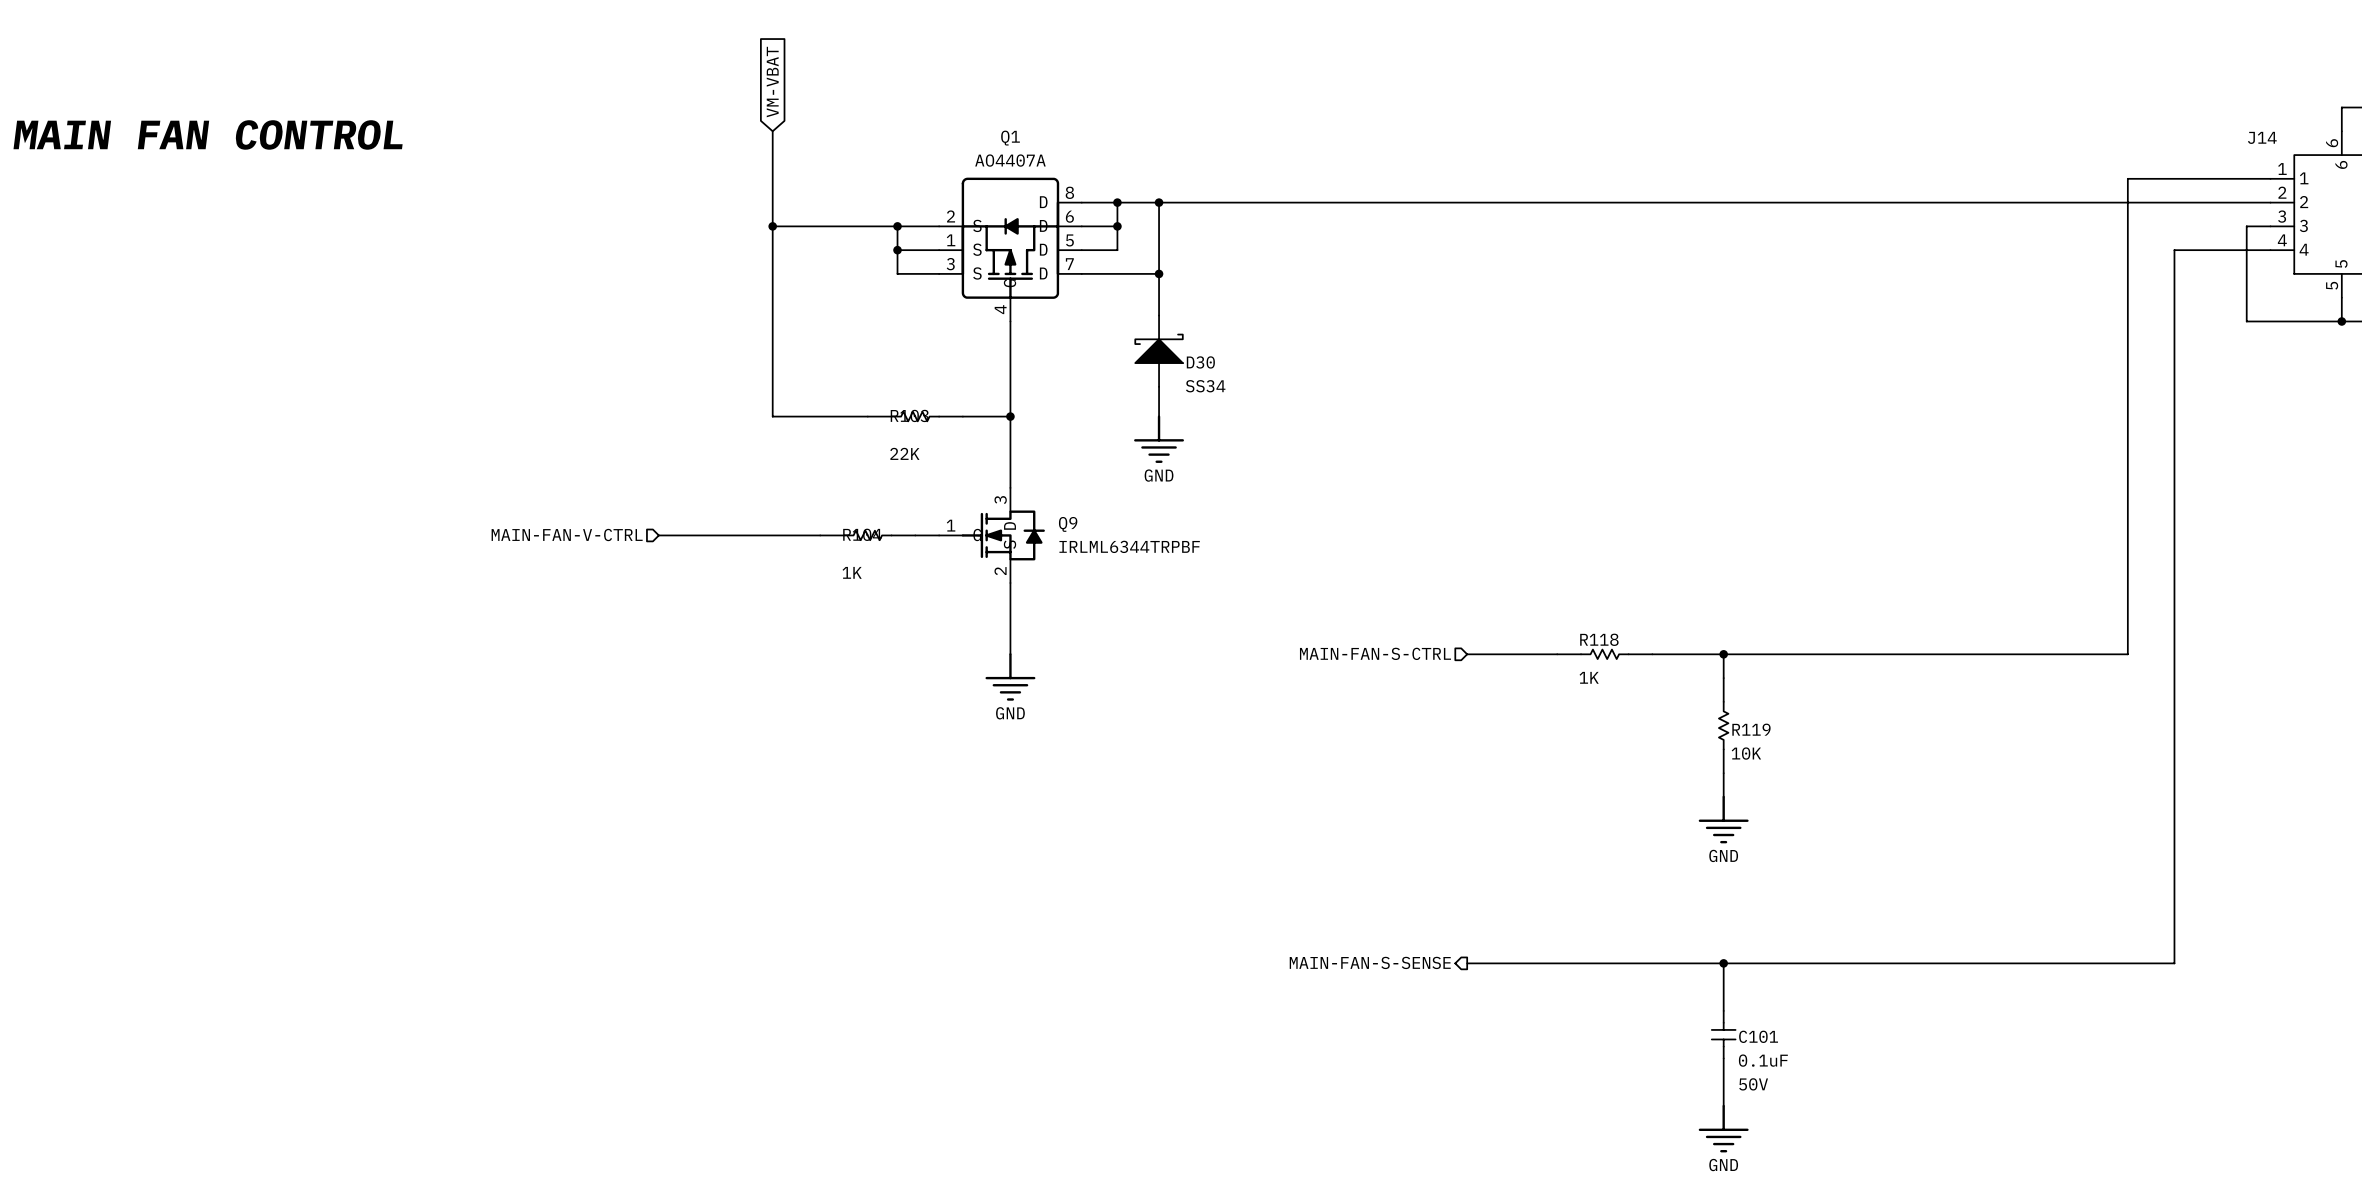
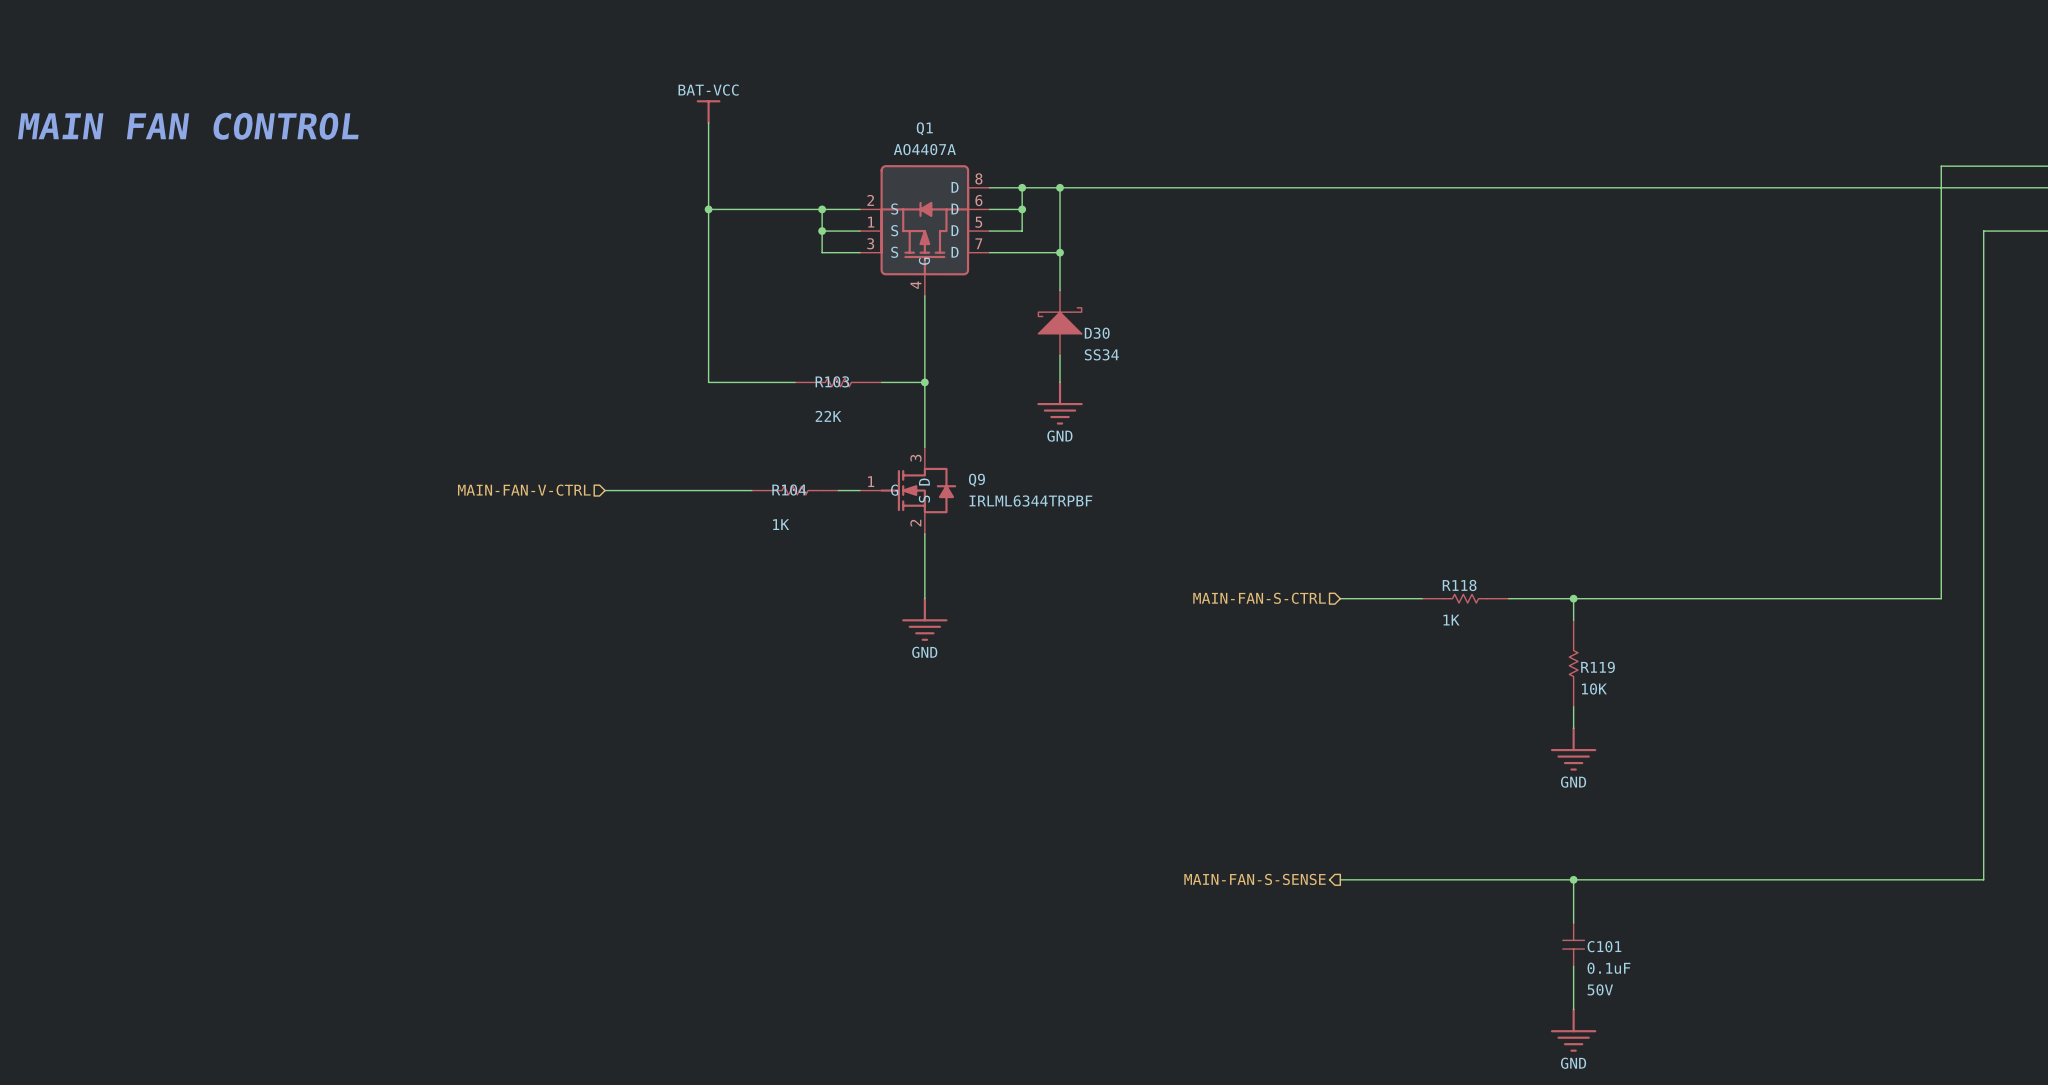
global label: VM-VBAT (772, 82) -> none
power symbol: none -> BAT-VCC (708, 112)

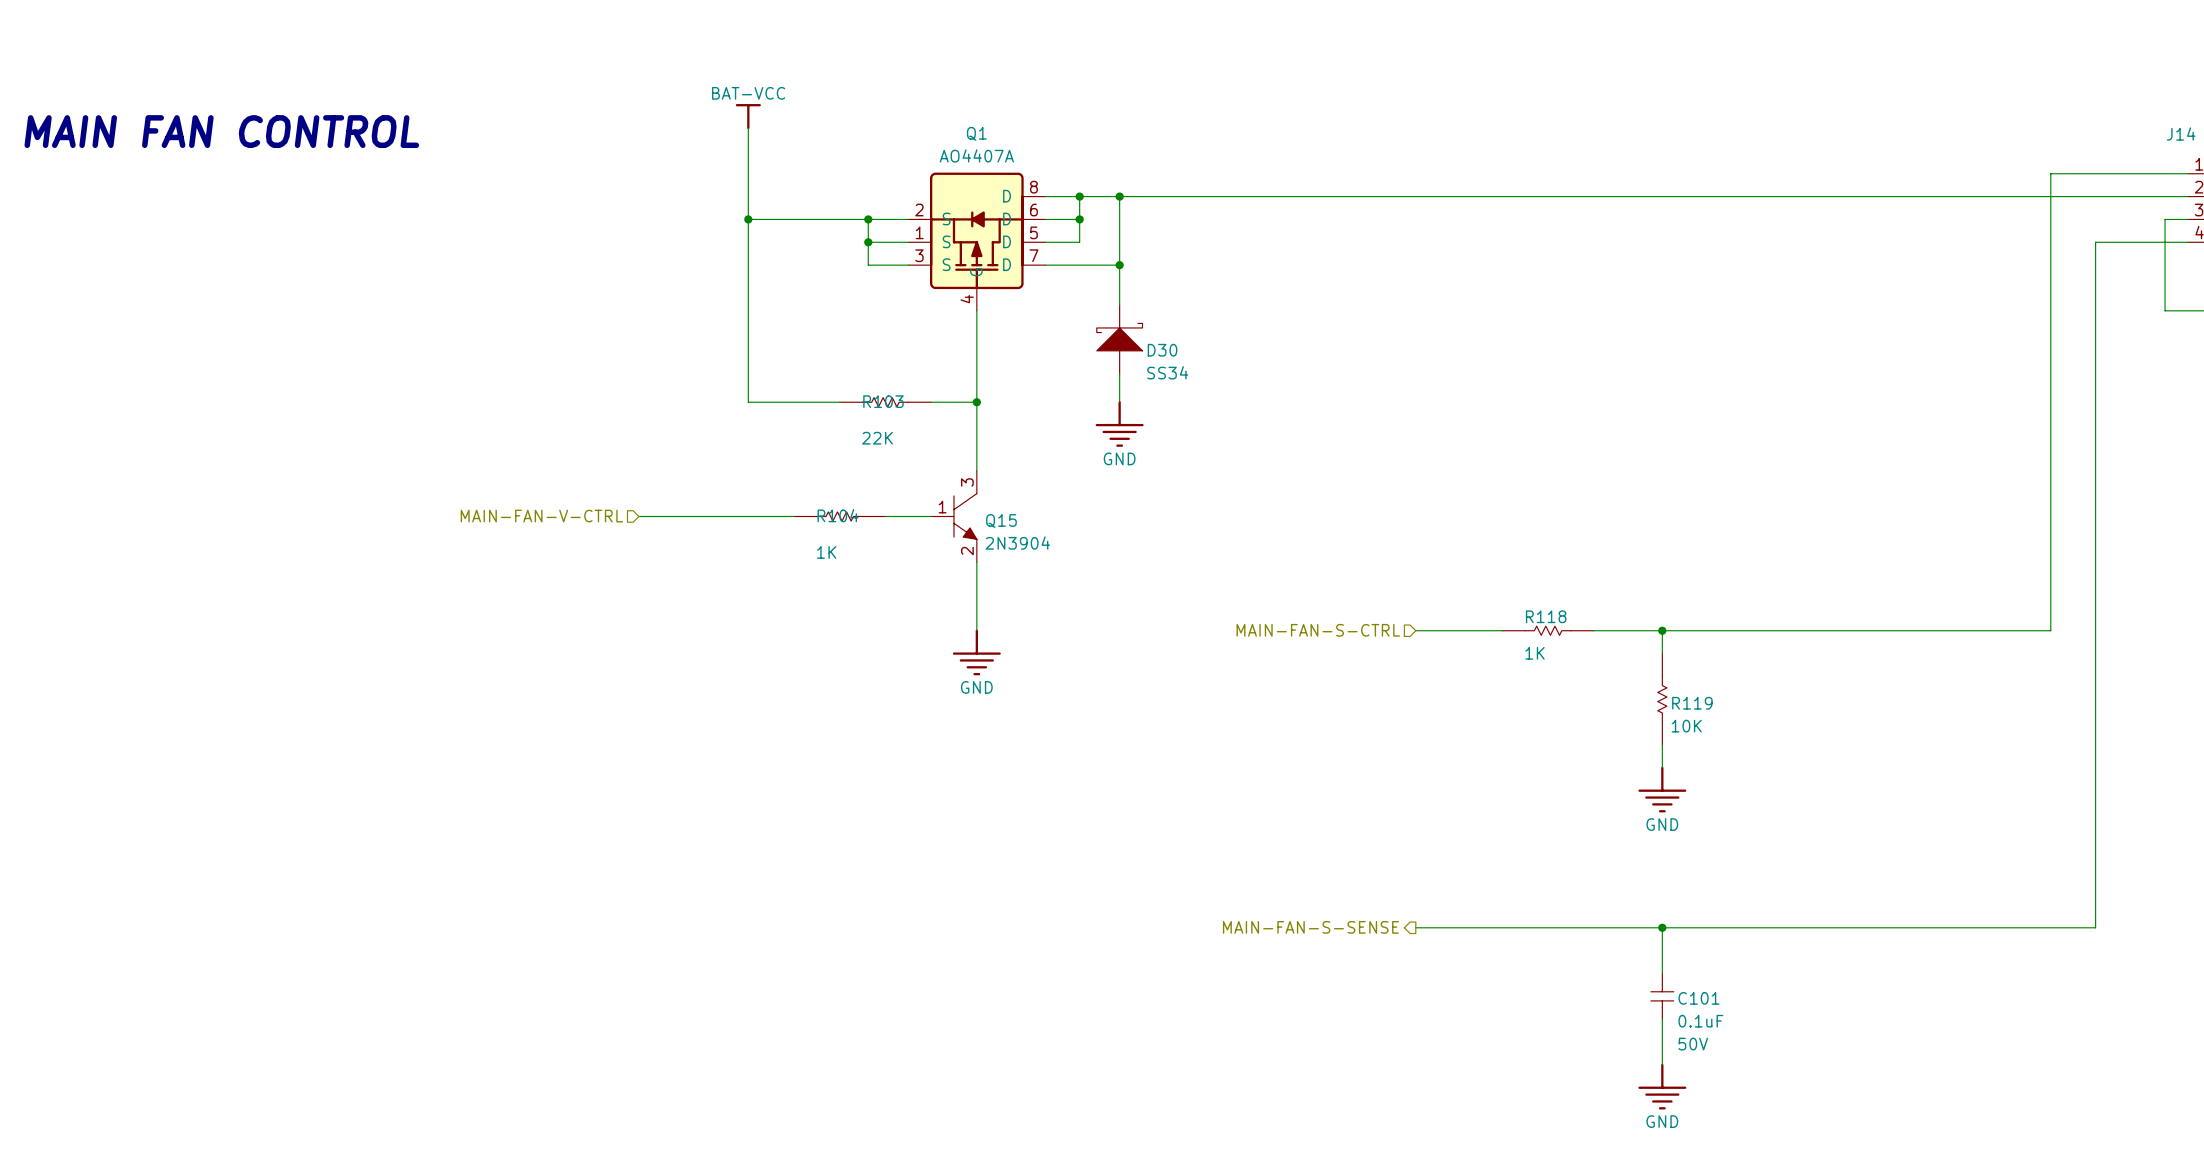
Q15: none -> 2N3904 (953, 516)
Q9: IRLML6344TRPBF (908, 490) -> none

